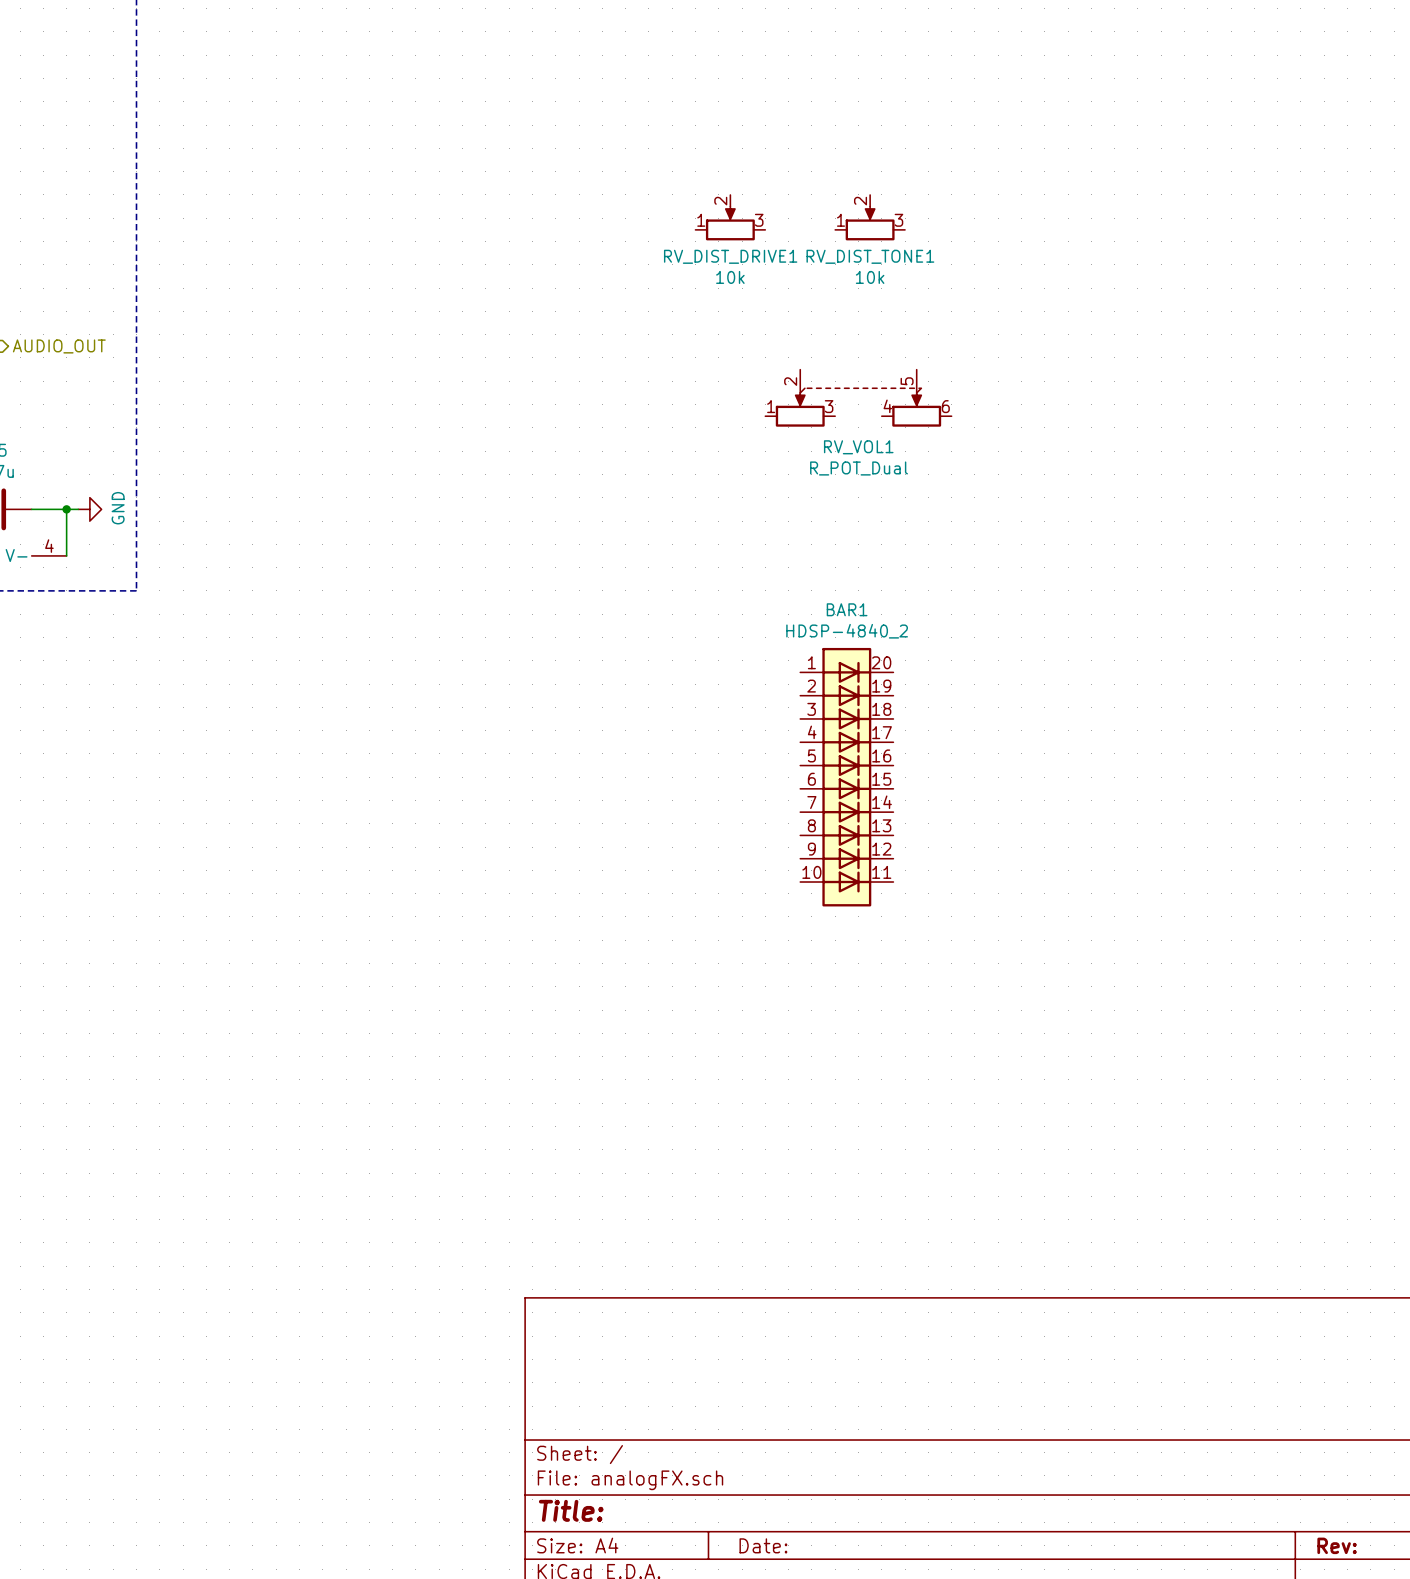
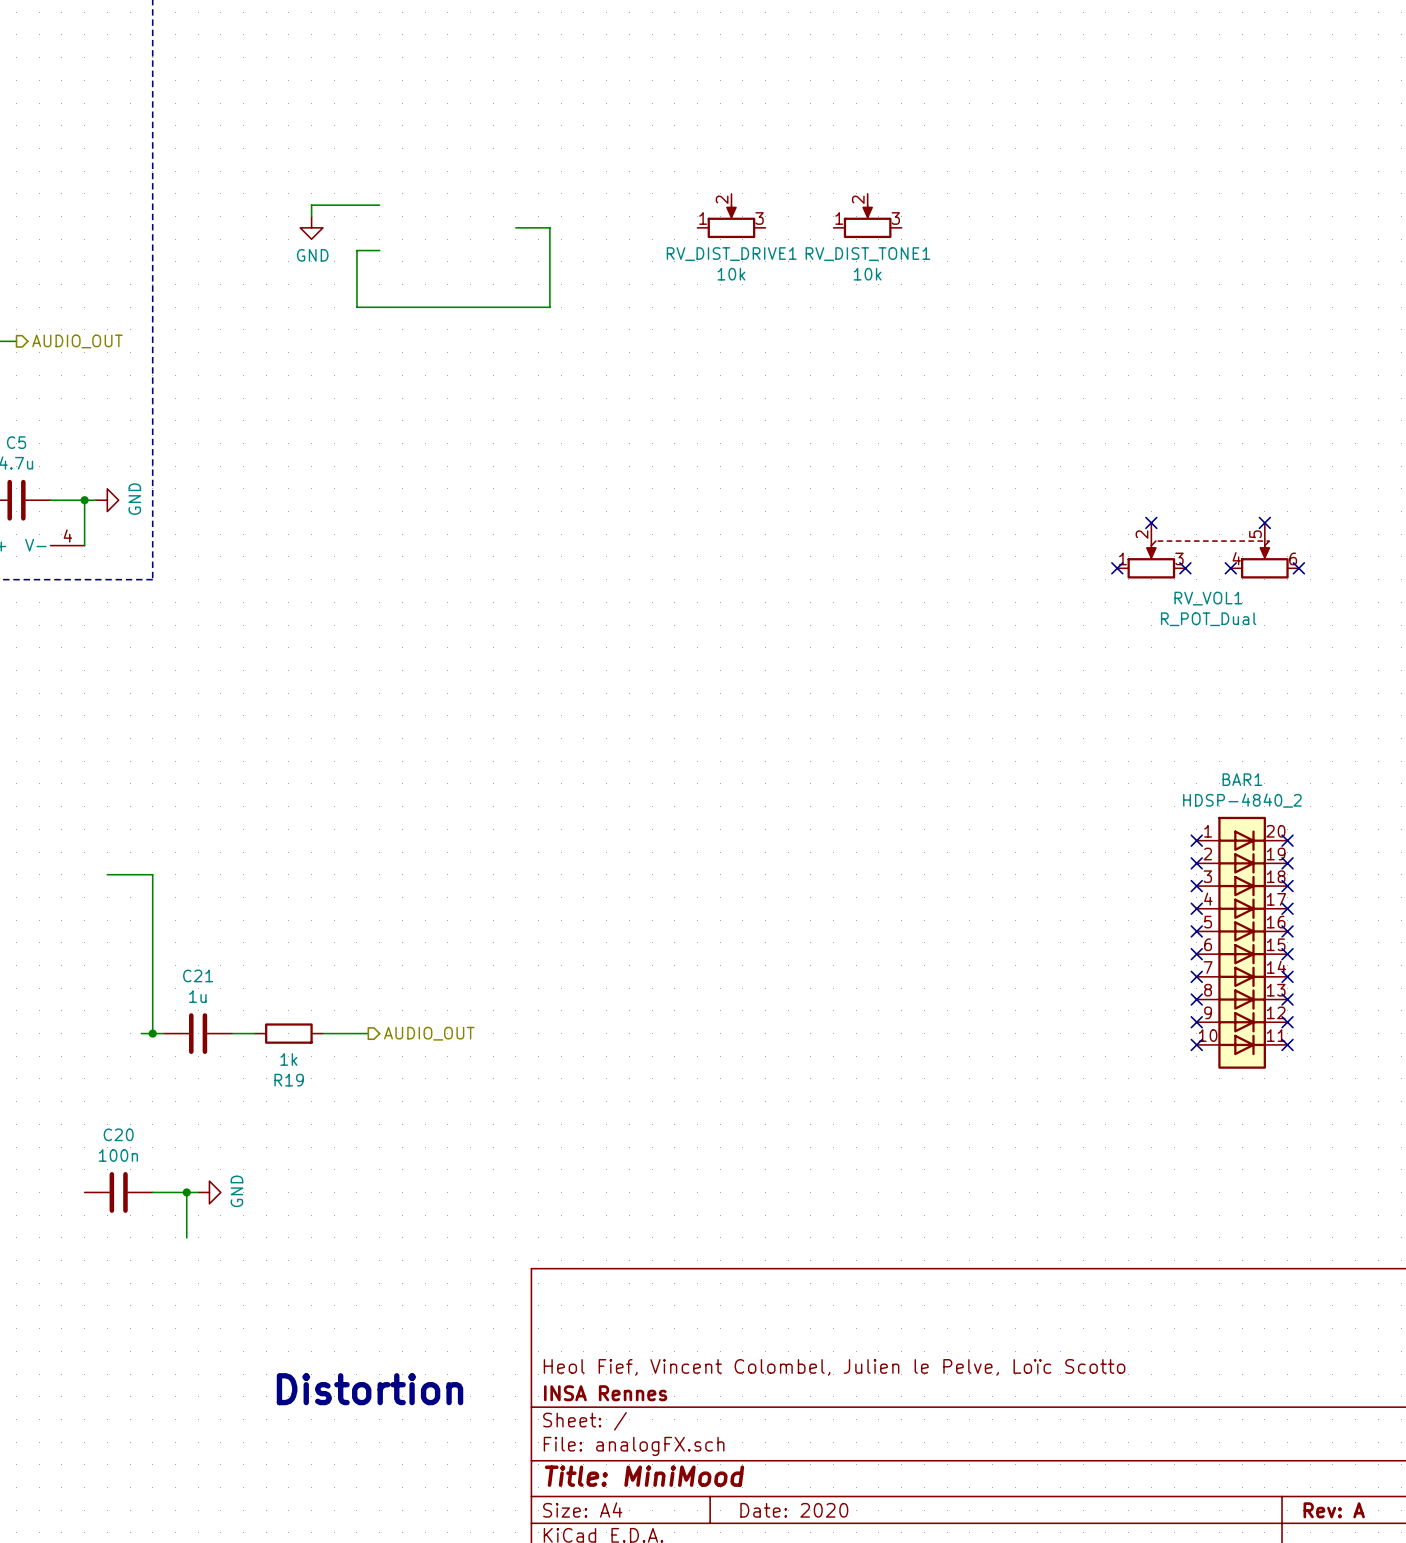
wire: none -> (379, 205) (311, 205) (311, 216)
power symbol: none -> GND (311, 227)
wire: none -> (515, 227) (549, 227) (549, 307) (356, 307) (356, 250) (379, 250)
RV_VOL1 position: (858, 398) -> (1208, 550)
no-connect mark: none -> (1151, 522)
no-connect mark: none -> (1264, 522)
no-connect mark: none -> (1117, 568)
no-connect mark: none -> (1185, 568)
no-connect mark: none -> (1230, 568)
no-connect mark: none -> (1298, 568)
BAR1 position: (846, 777) -> (1242, 942)
no-connect mark: none -> (1196, 840)
no-connect mark: none -> (1287, 840)
no-connect mark: none -> (1196, 863)
no-connect mark: none -> (1287, 863)
wire: none -> (107, 874) (152, 874) (152, 1033)
no-connect mark: none -> (1196, 886)
no-connect mark: none -> (1287, 886)
no-connect mark: none -> (1196, 908)
no-connect mark: none -> (1287, 908)
no-connect mark: none -> (1196, 931)
no-connect mark: none -> (1287, 931)
no-connect mark: none -> (1196, 954)
no-connect mark: none -> (1287, 954)
no-connect mark: none -> (1196, 976)
no-connect mark: none -> (1287, 976)
no-connect mark: none -> (1196, 999)
no-connect mark: none -> (1287, 999)
no-connect mark: none -> (1196, 1022)
no-connect mark: none -> (1287, 1022)
wire: none -> (141, 1033) (164, 1033)
junction: none -> (152, 1033)
C21: none -> 1u (198, 1033)
wire: none -> (232, 1033) (254, 1033)
R19: none -> 1k (288, 1033)
wire: none -> (322, 1033) (368, 1033)
hierarchical label: none -> AUDIO_OUT (429, 1033)
no-connect mark: none -> (1196, 1044)
no-connect mark: none -> (1287, 1044)
C20: none -> 100n (118, 1192)
wire: none -> (152, 1192) (198, 1192)
wire: none -> (186, 1192) (186, 1237)
junction: none -> (186, 1192)
power symbol: none -> GND (209, 1192)
title block: none -> Heol Fief, Vincent Colombel, Julien le Pelve, Loïc Scotto (834, 1367)
text: none -> Distortion (370, 1389)
title block: none -> INSA Rennes (605, 1393)
title block: Title: (571, 1510) -> Title: MiniMood (644, 1476)
title block: Date: (763, 1545) -> Date: 2020 (794, 1510)
title block: Rev: (1337, 1545) -> Rev: A (1334, 1510)

